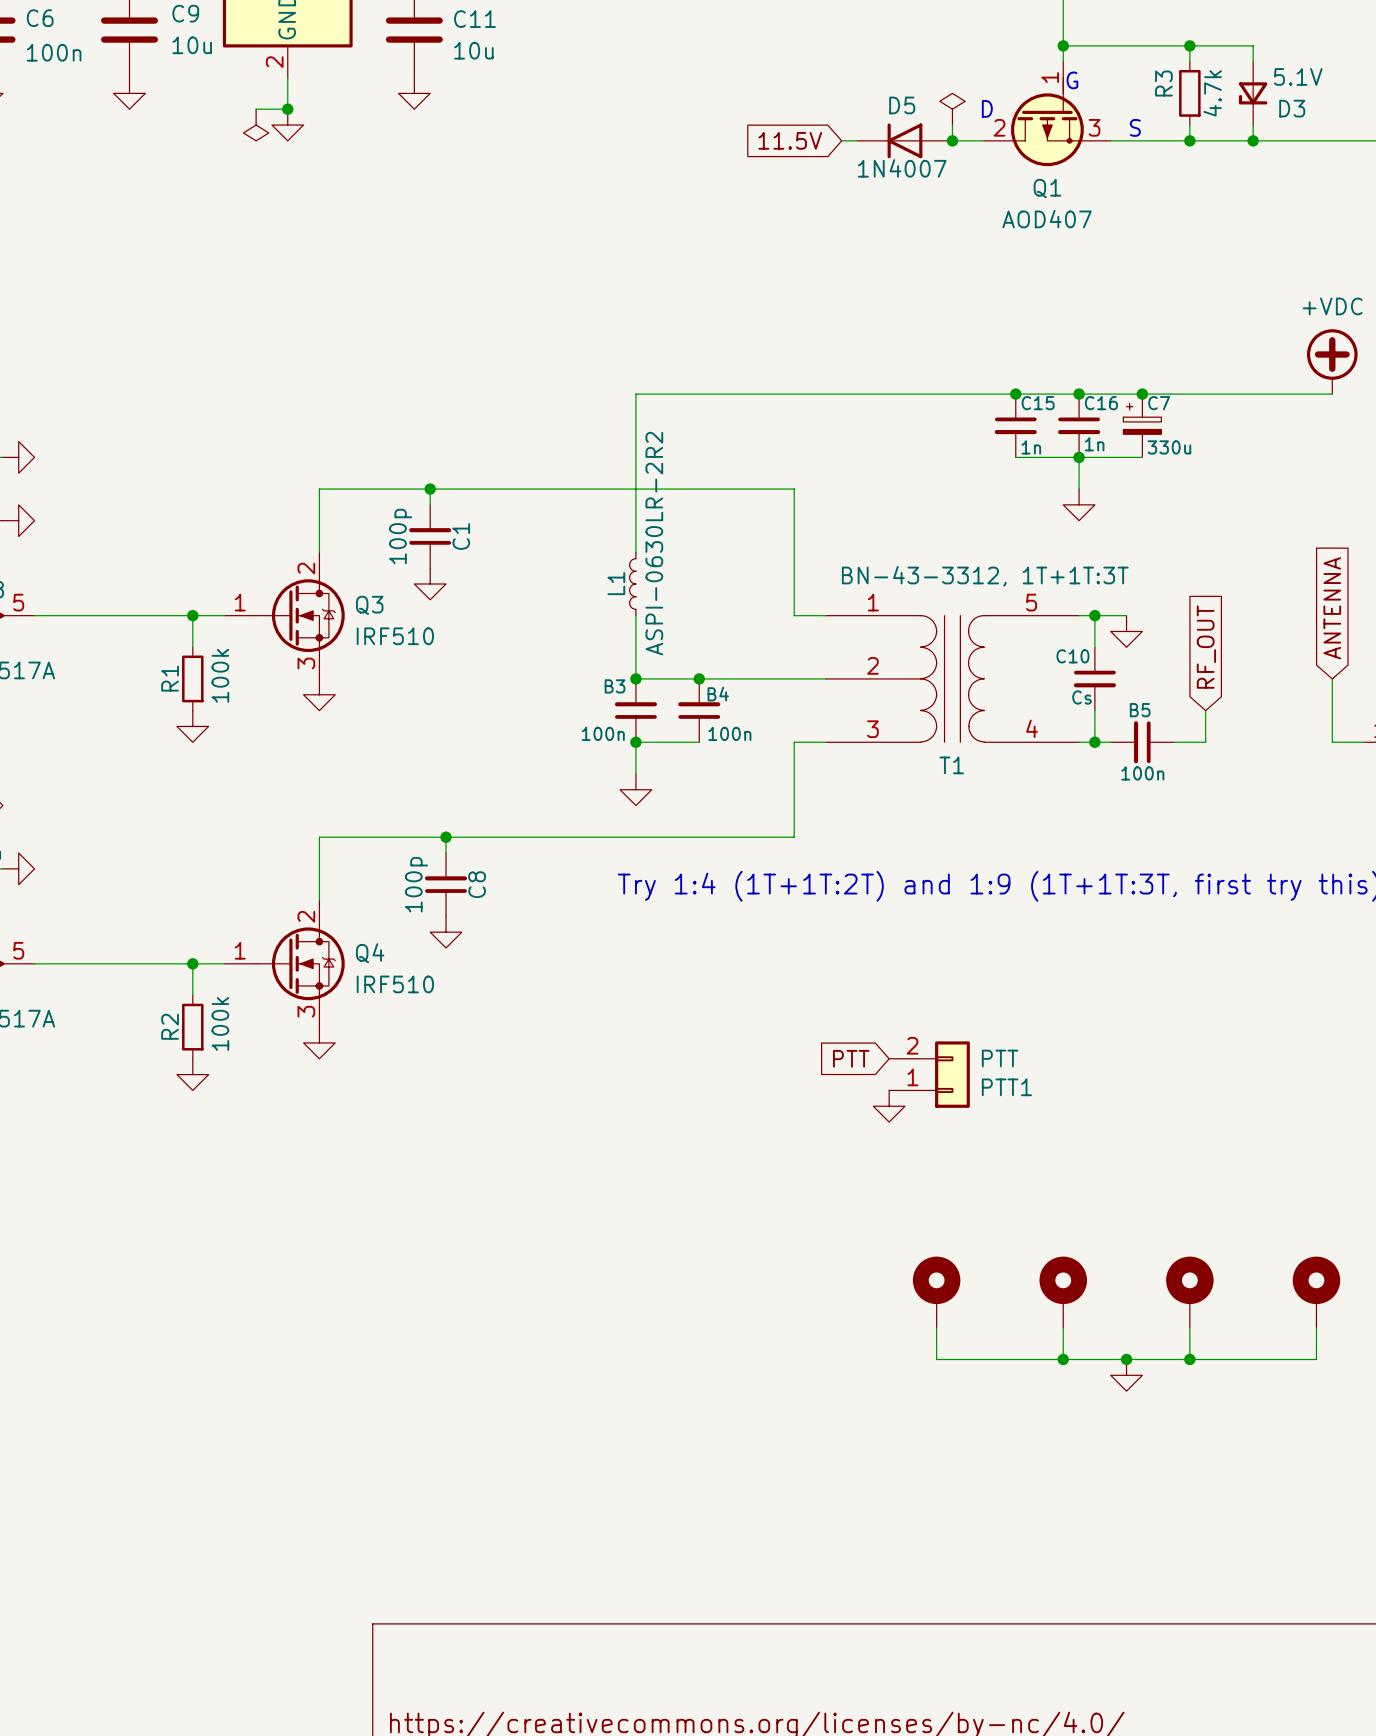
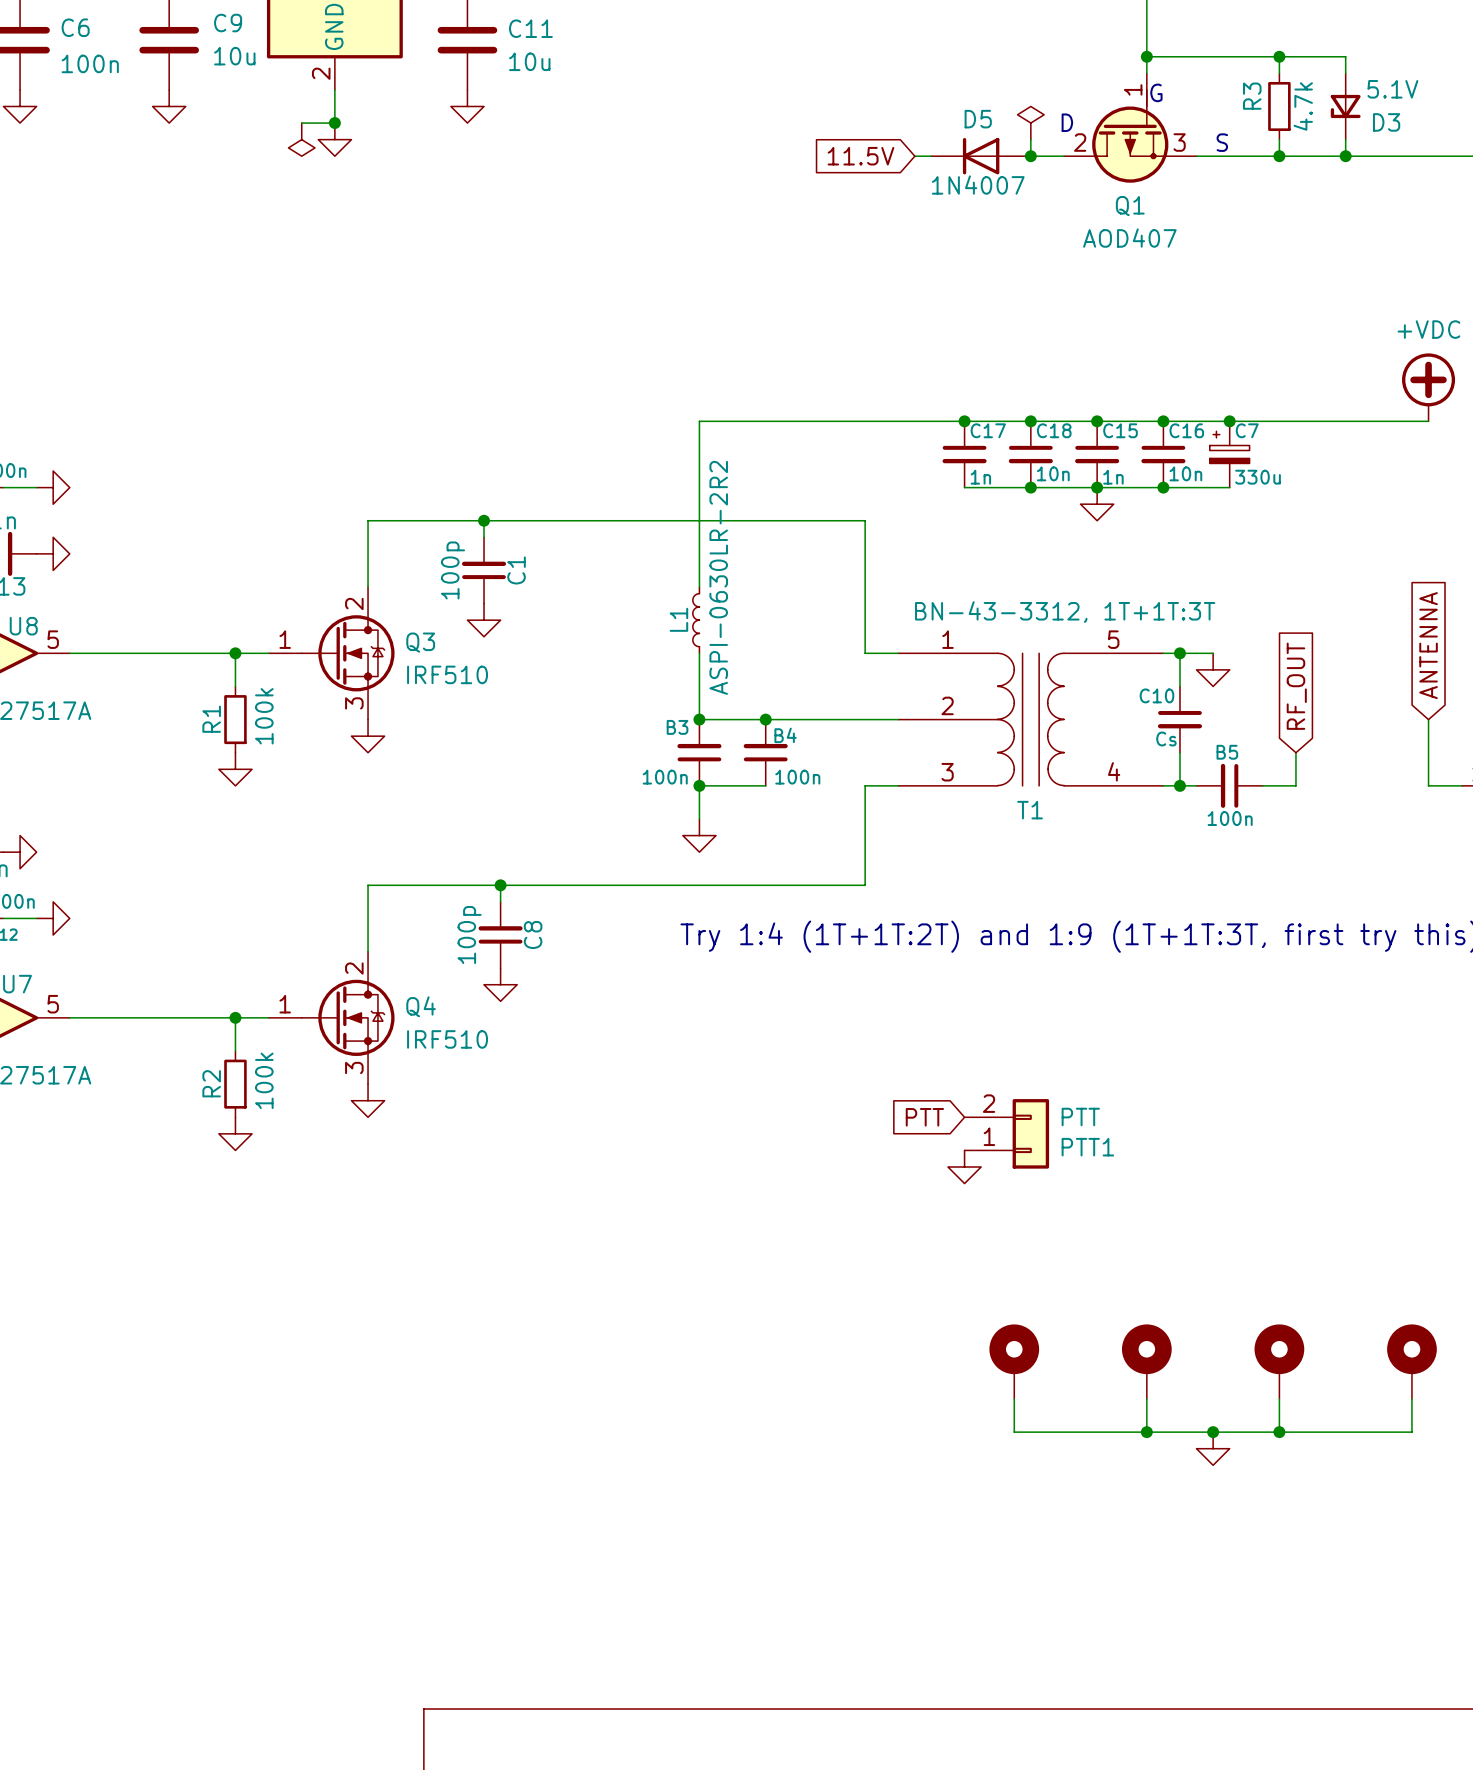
junction: none -> (964, 421)
junction: none -> (1030, 421)
C17: none -> 1n (964, 454)
C18: none -> 10n (1030, 454)
C16 value: 1n (1094, 444) -> 10n (1185, 473)
wire: none -> (964, 487) (1097, 487)
junction: none -> (1030, 487)
junction: none -> (1097, 487)
wire: (1079, 457) (1079, 489) -> none
power symbol position: (1079, 504) -> (1097, 504)

